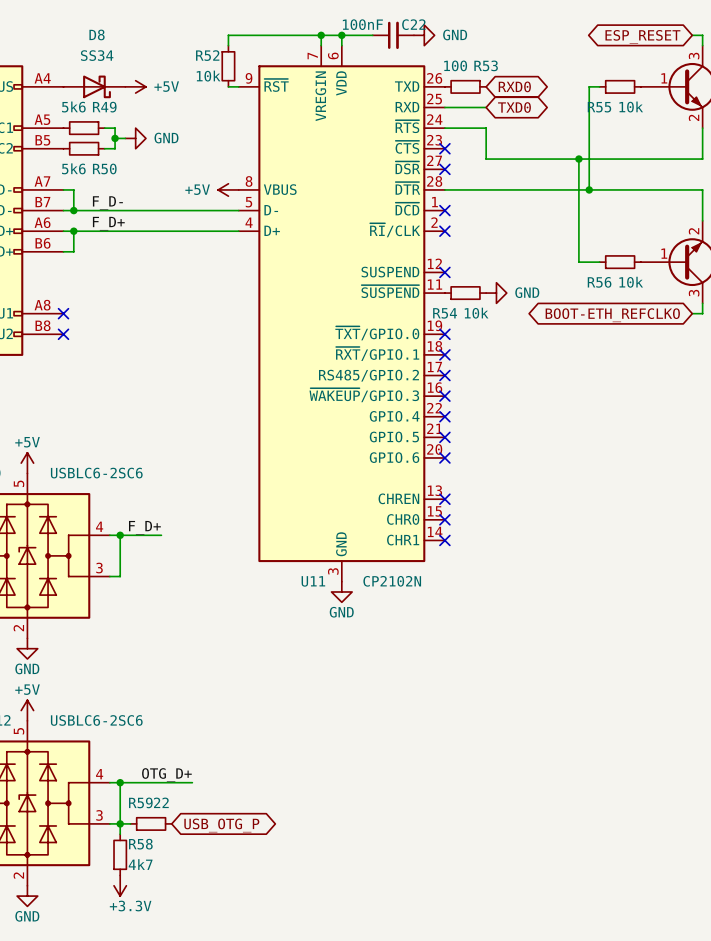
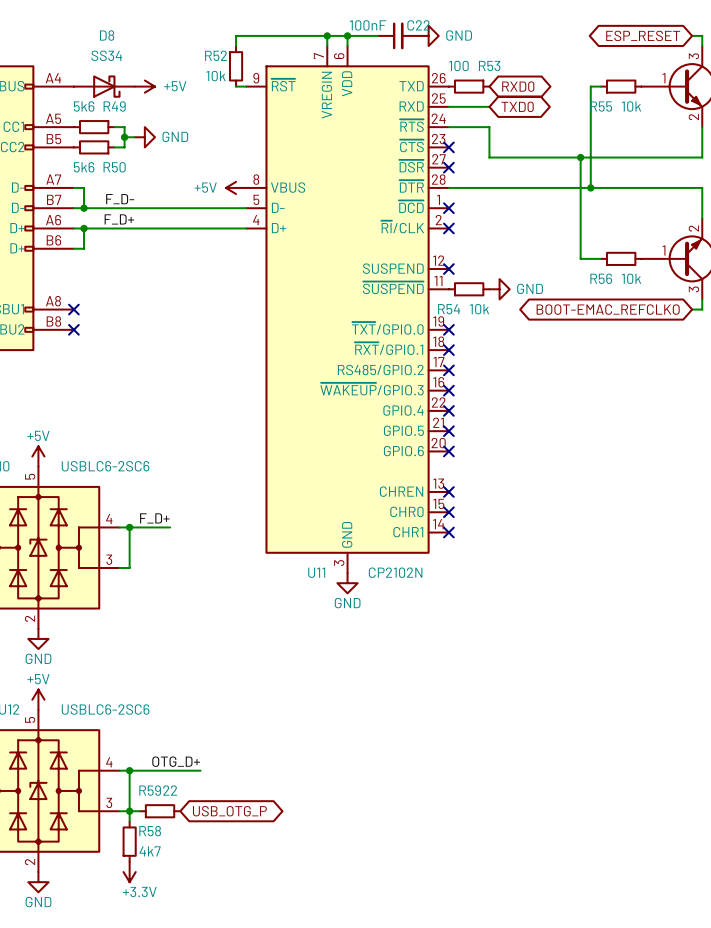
global label: BOOT-ETH_REFCLKO (612, 315) -> BOOT-EMAC_REFCLKO (608, 309)

